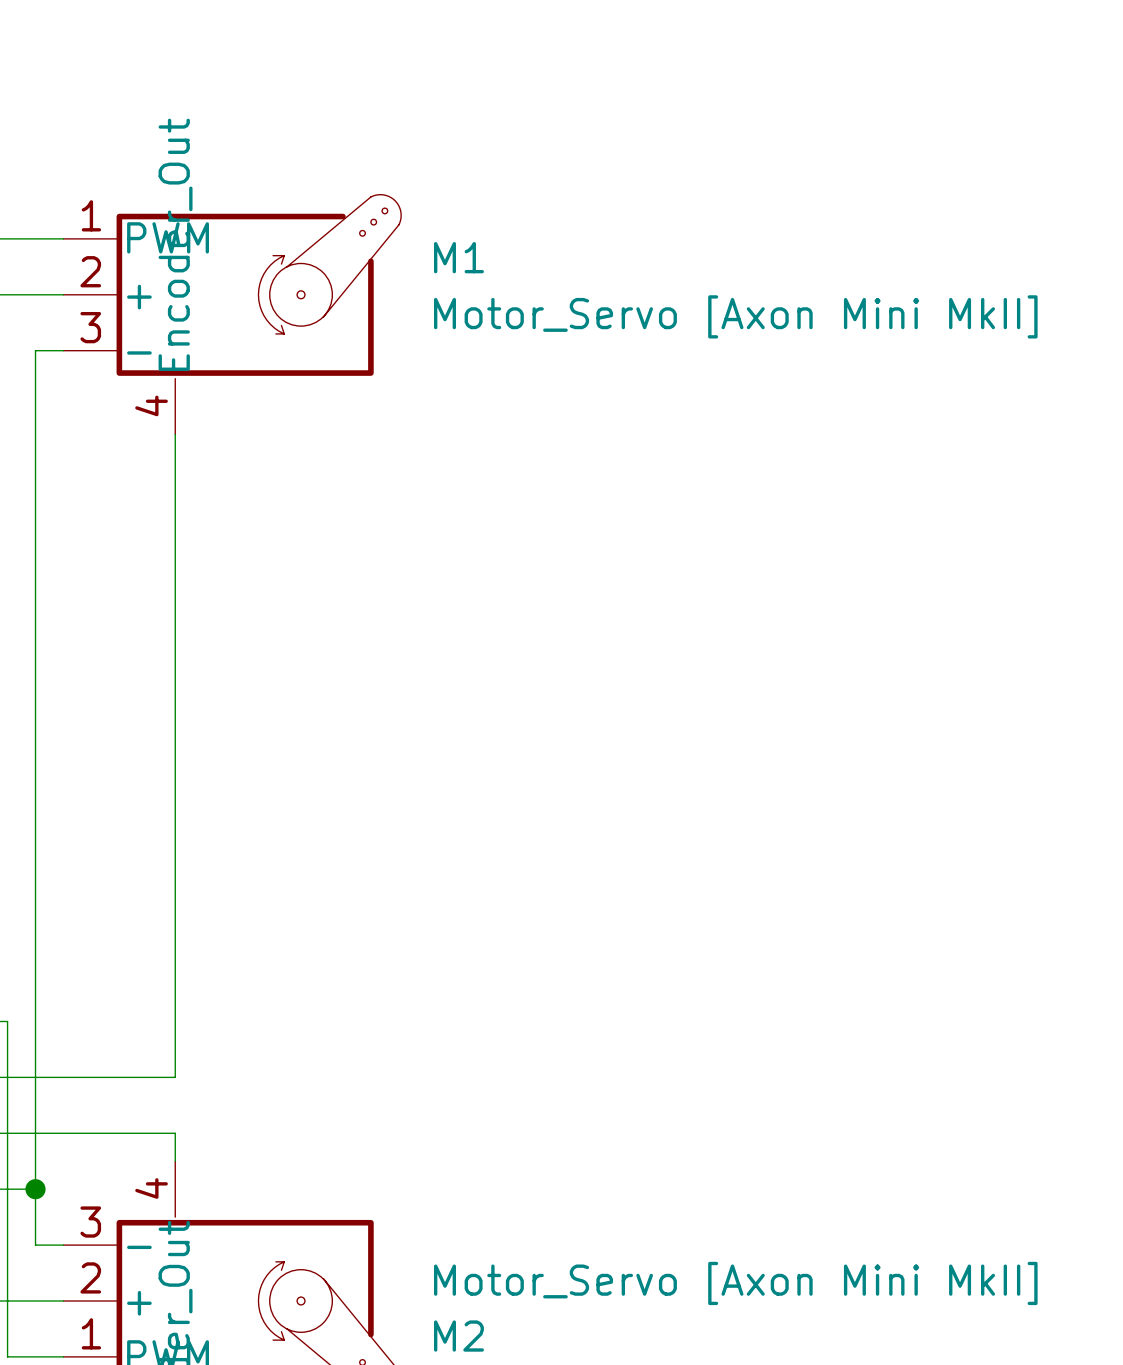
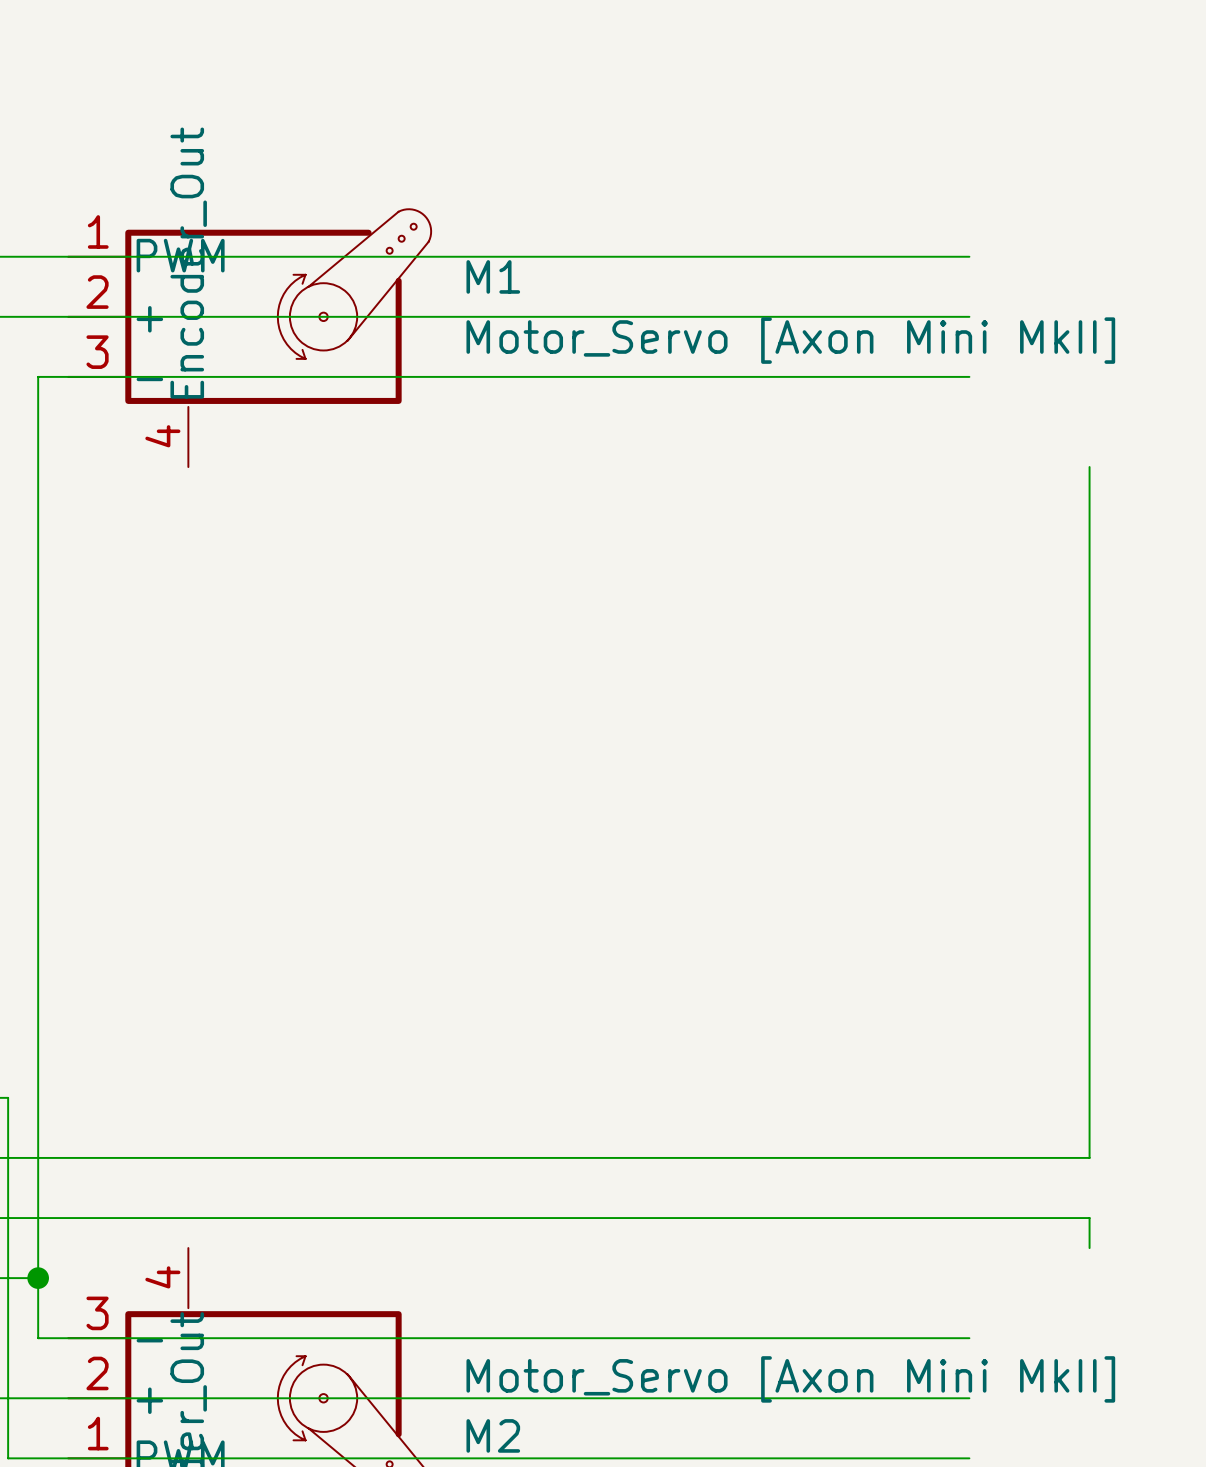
wire: none -> (68, 256) (969, 256)
wire: none -> (68, 316) (969, 316)
wire: none -> (68, 376) (969, 376)
wire: (175, 434) (175, 1077) -> (1089, 467) (1089, 1157) (188, 1157)
wire: (175, 1133) (175, 1161) -> (188, 1218) (1089, 1218) (1089, 1248)
wire: none -> (68, 1338) (969, 1338)
wire: none -> (68, 1398) (969, 1398)
wire: none -> (68, 1458) (969, 1458)

